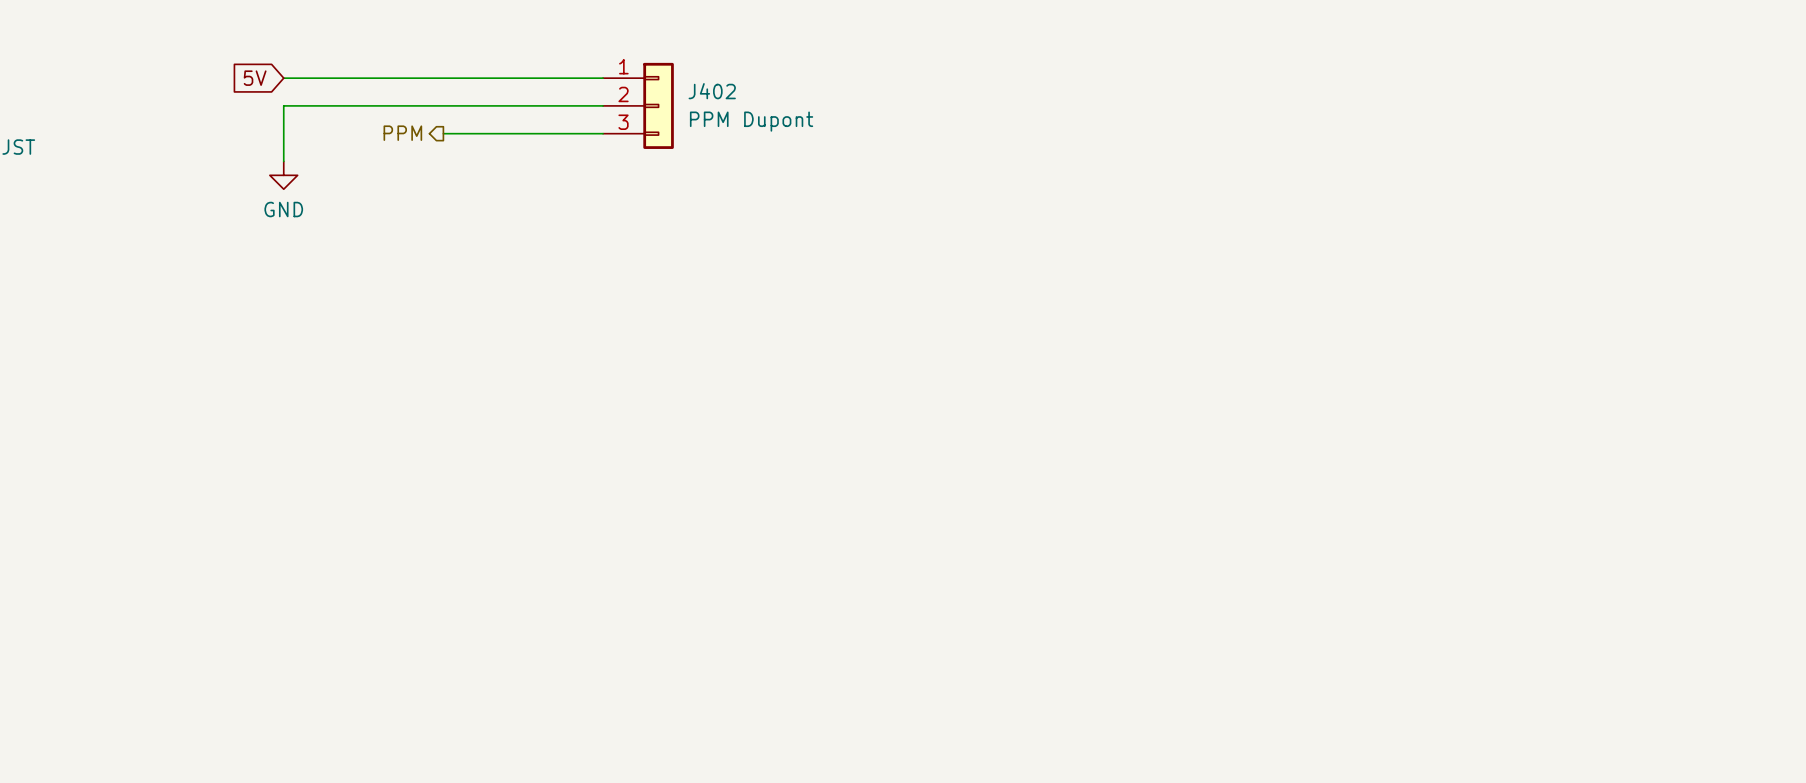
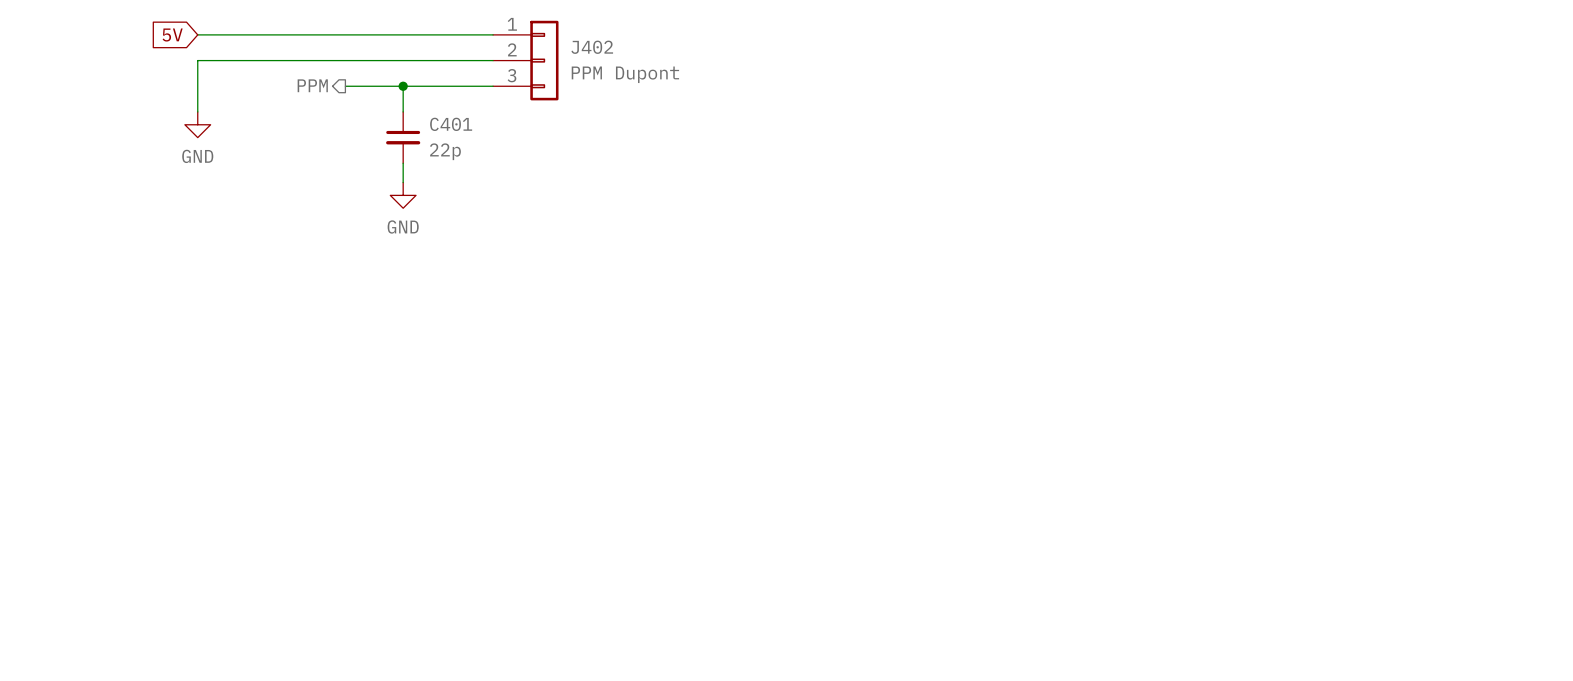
wire: none -> (403, 86) (403, 111)
junction: none -> (403, 86)
C401: none -> 22p (403, 137)
wire: none -> (403, 163) (403, 182)
power symbol: none -> GND (403, 195)

